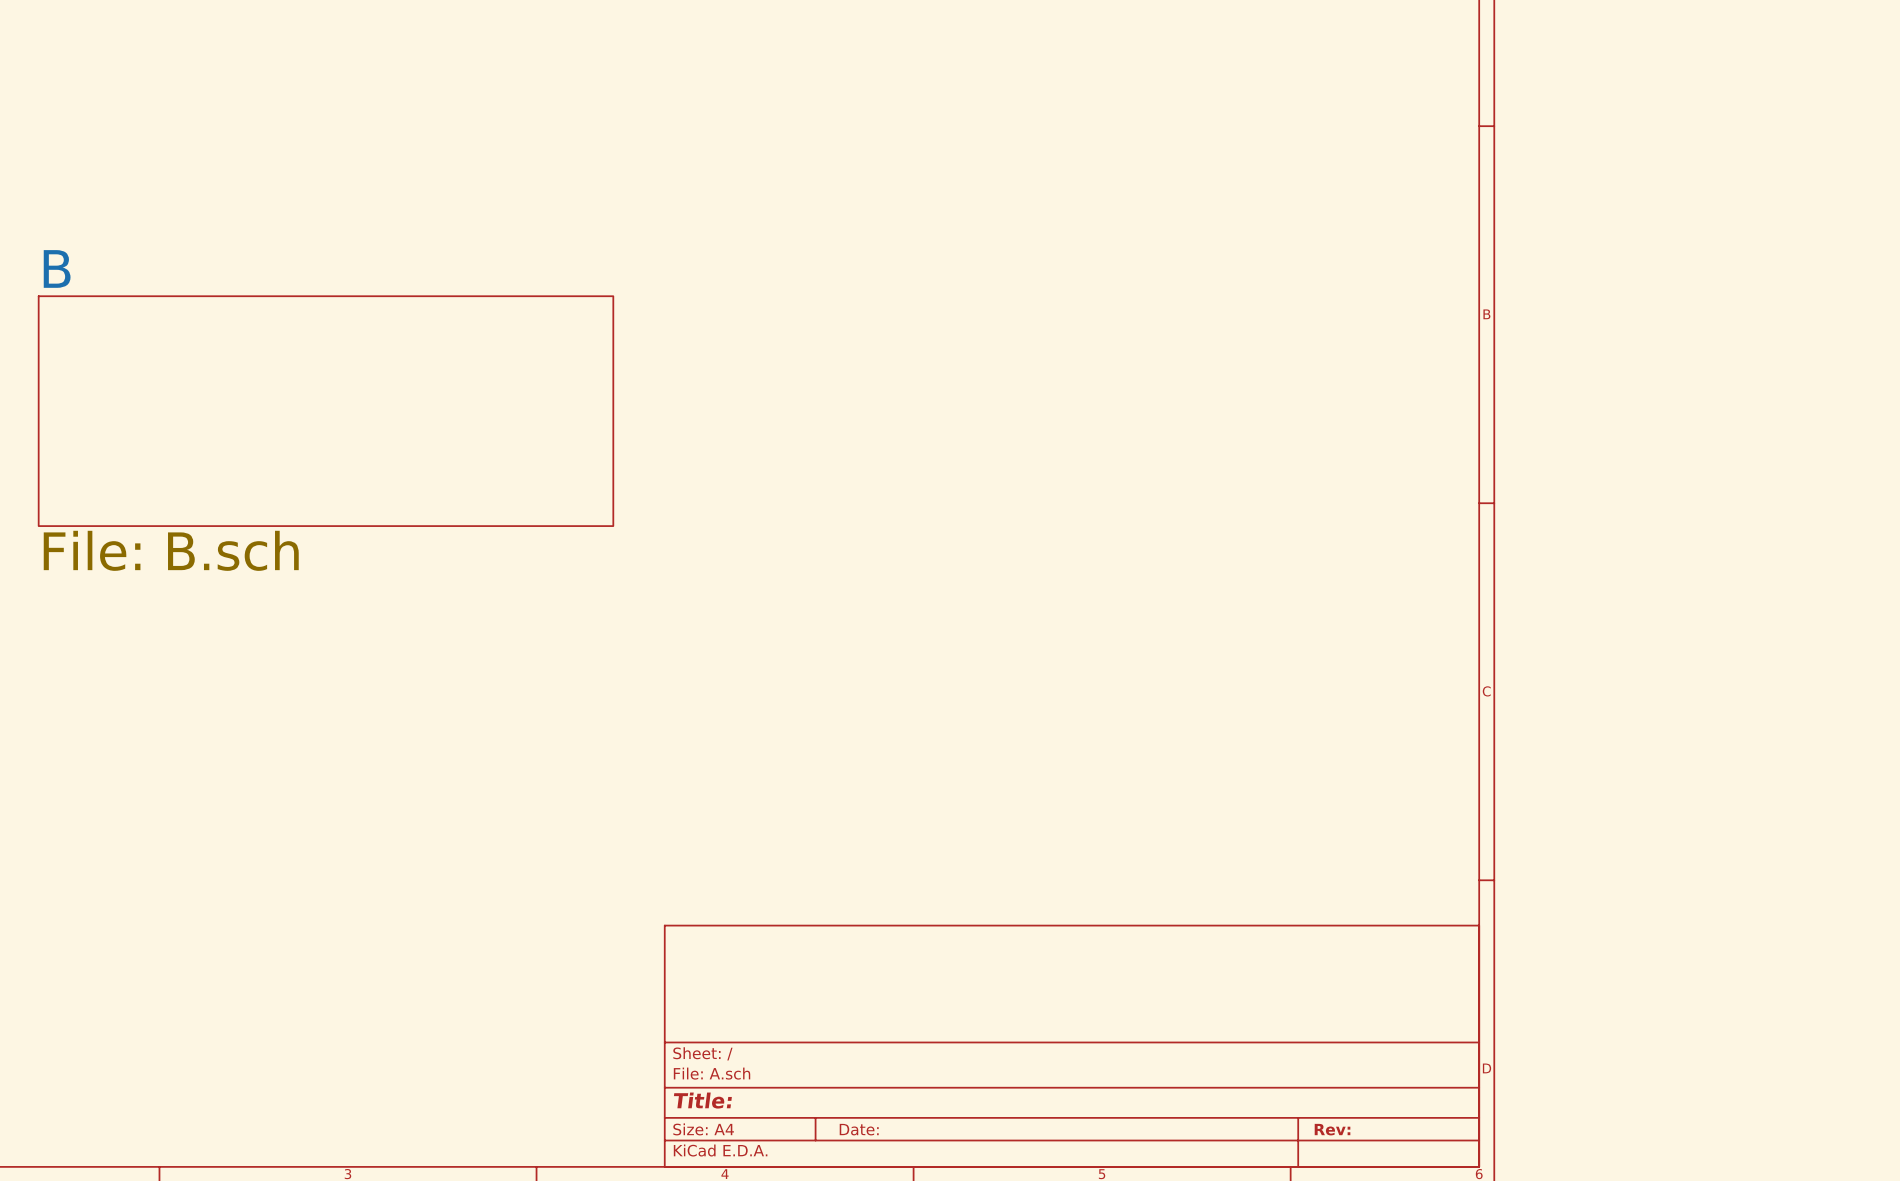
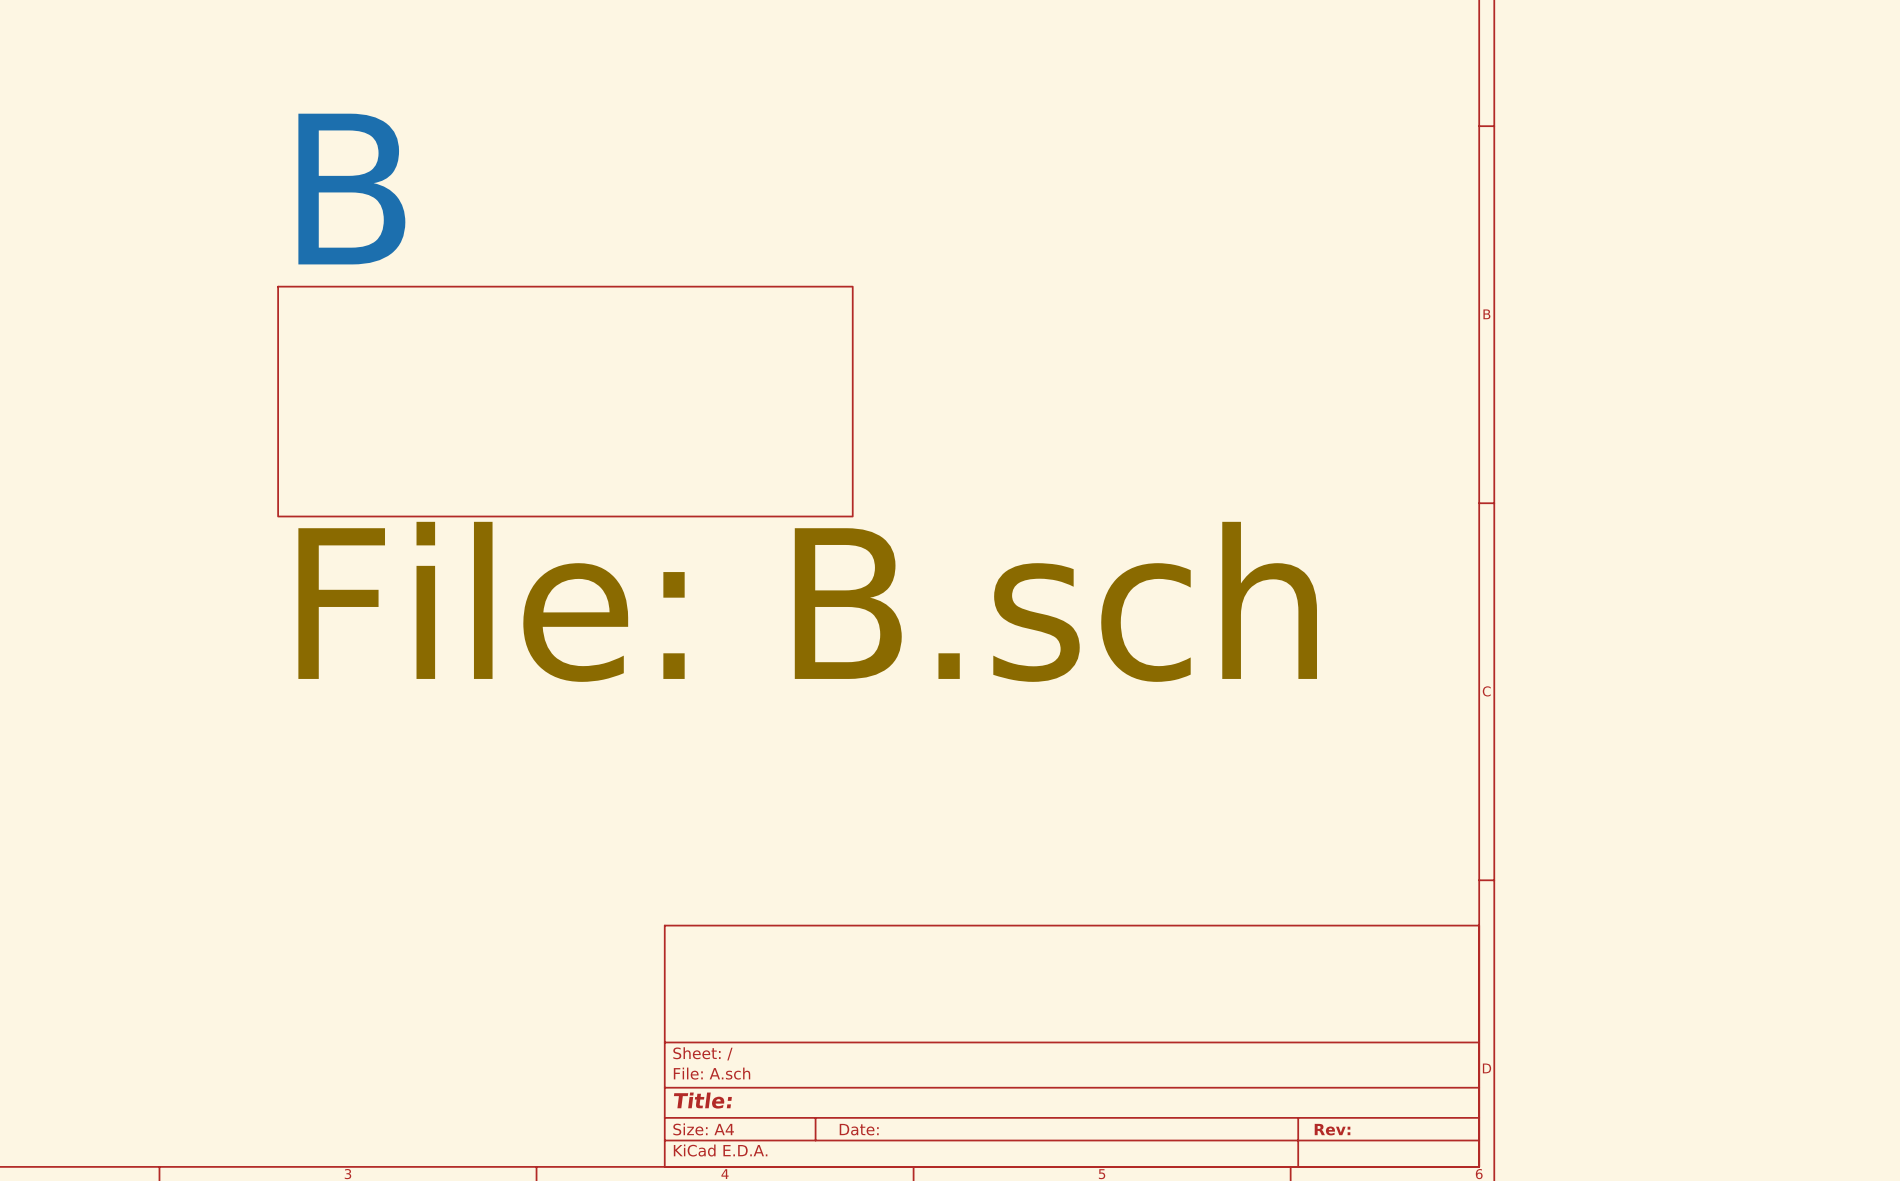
sheet B: none -> File: B.sch (565, 401)
sheet B: File: B.sch (325, 411) -> none

